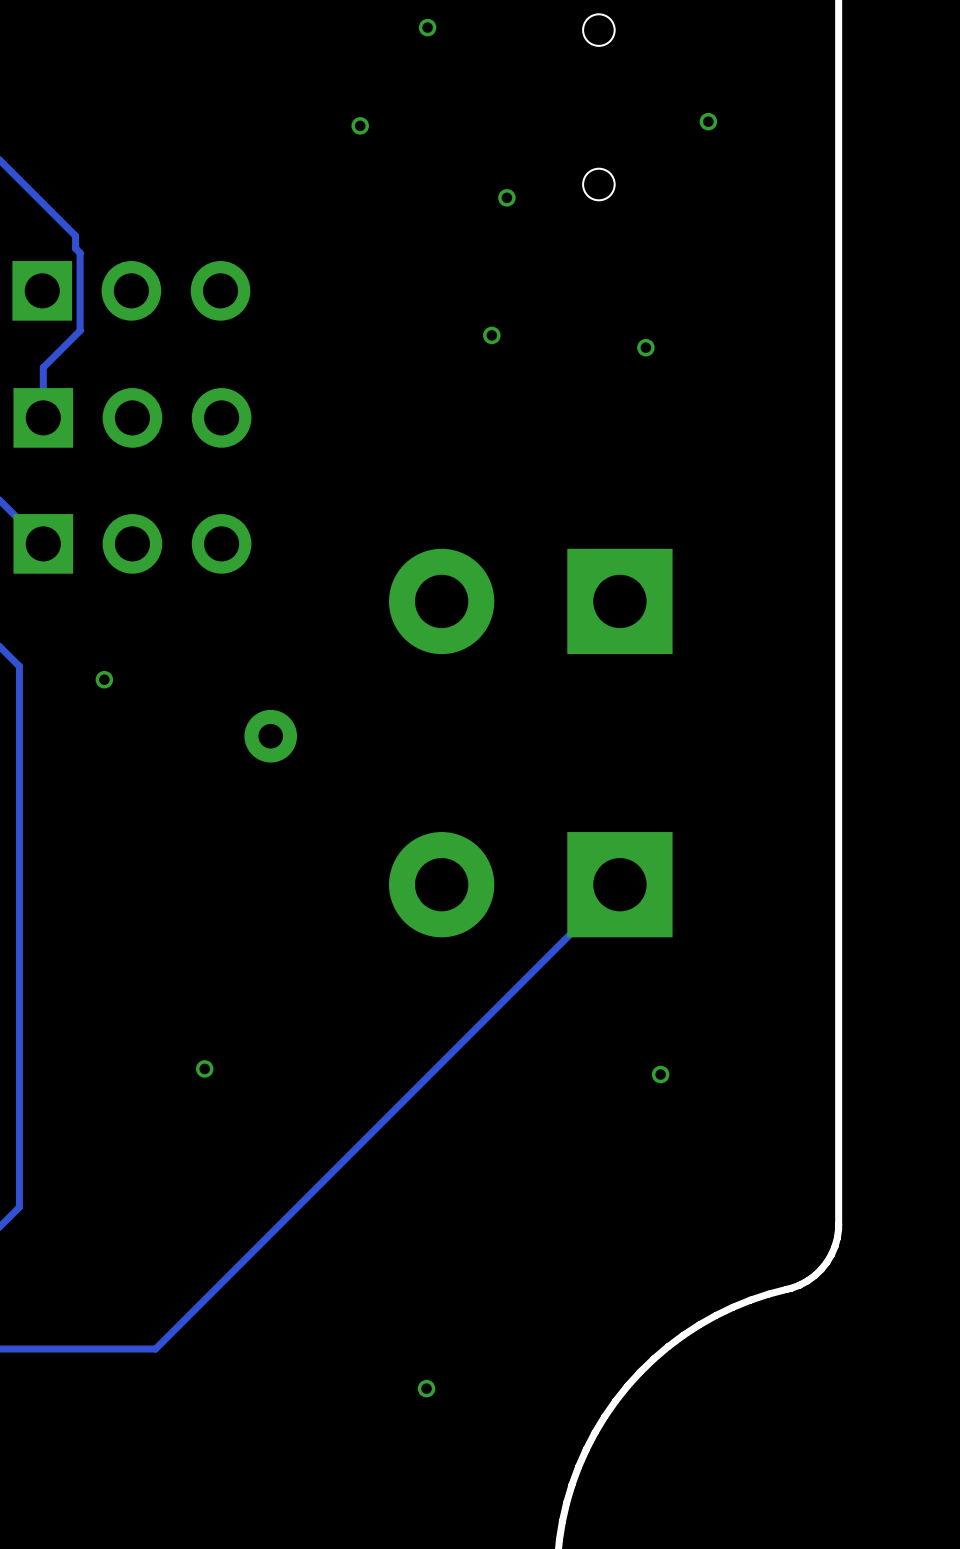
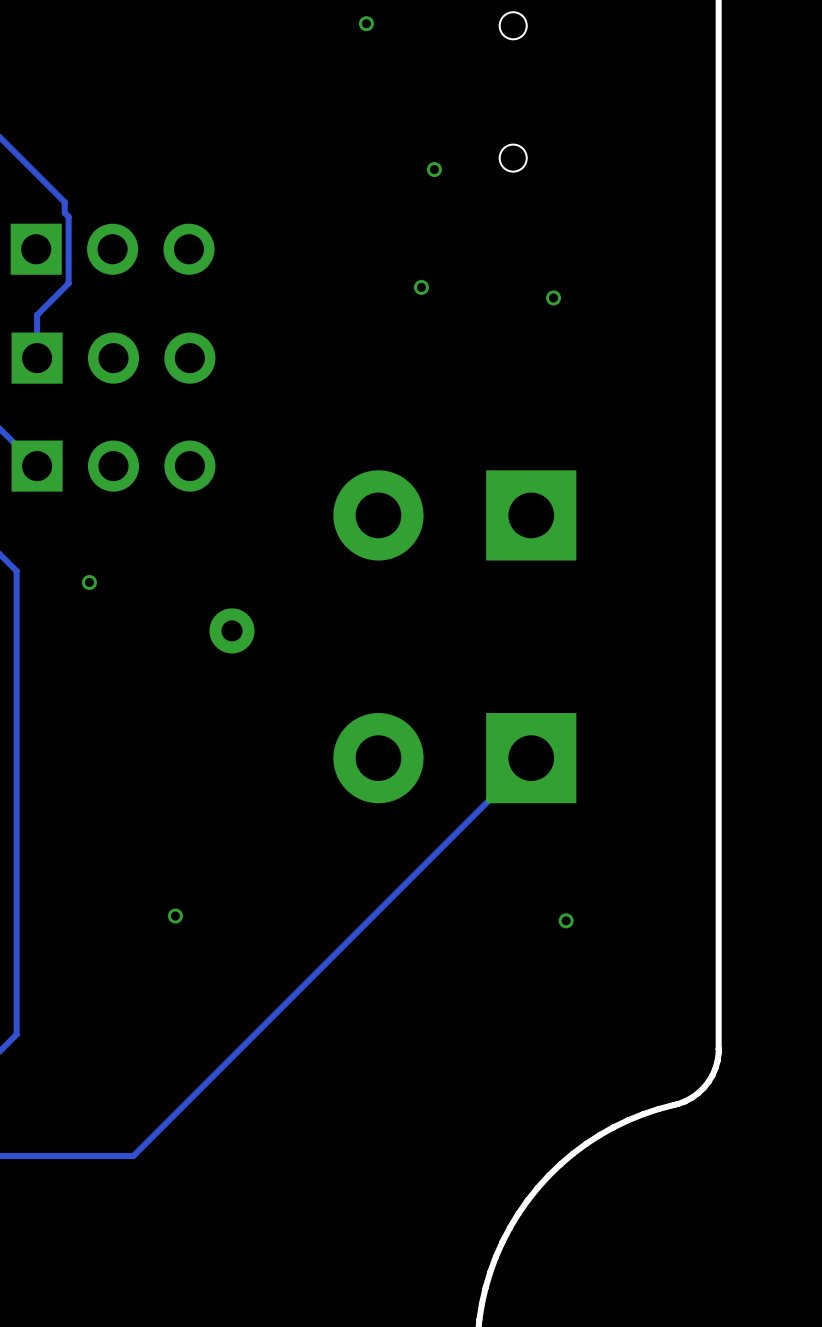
via: (708, 121) -> none
via: (360, 125) -> none
via: (426, 1388) -> none

